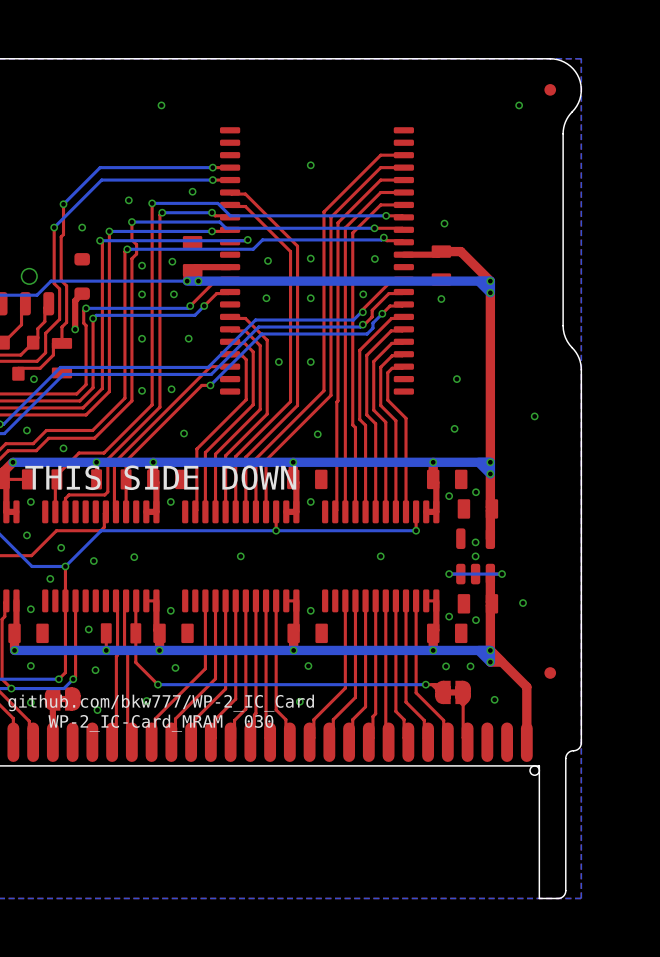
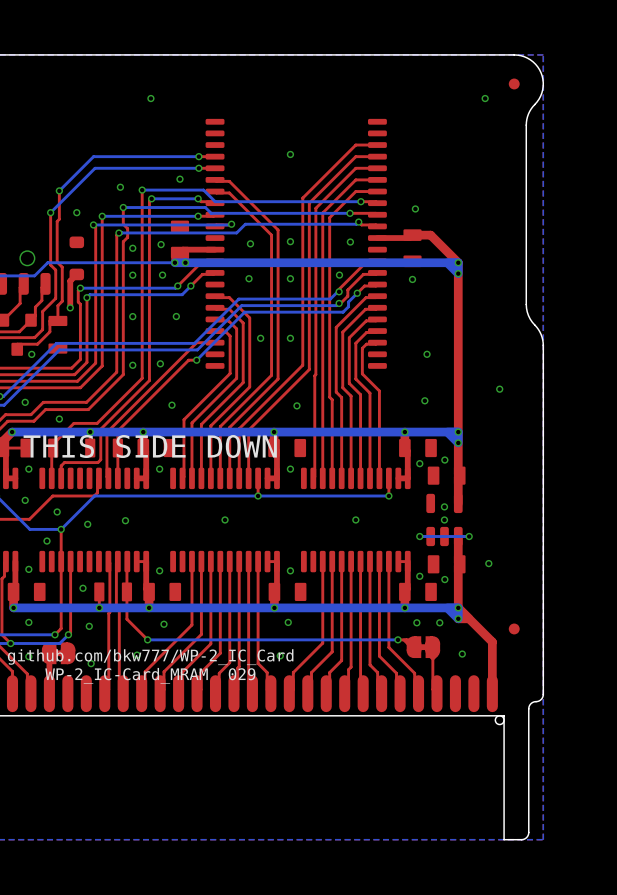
text: WP-2_IC-Card_MRAM 030 (160, 723) -> WP-2_IC-Card_MRAM 029 (150, 675)

